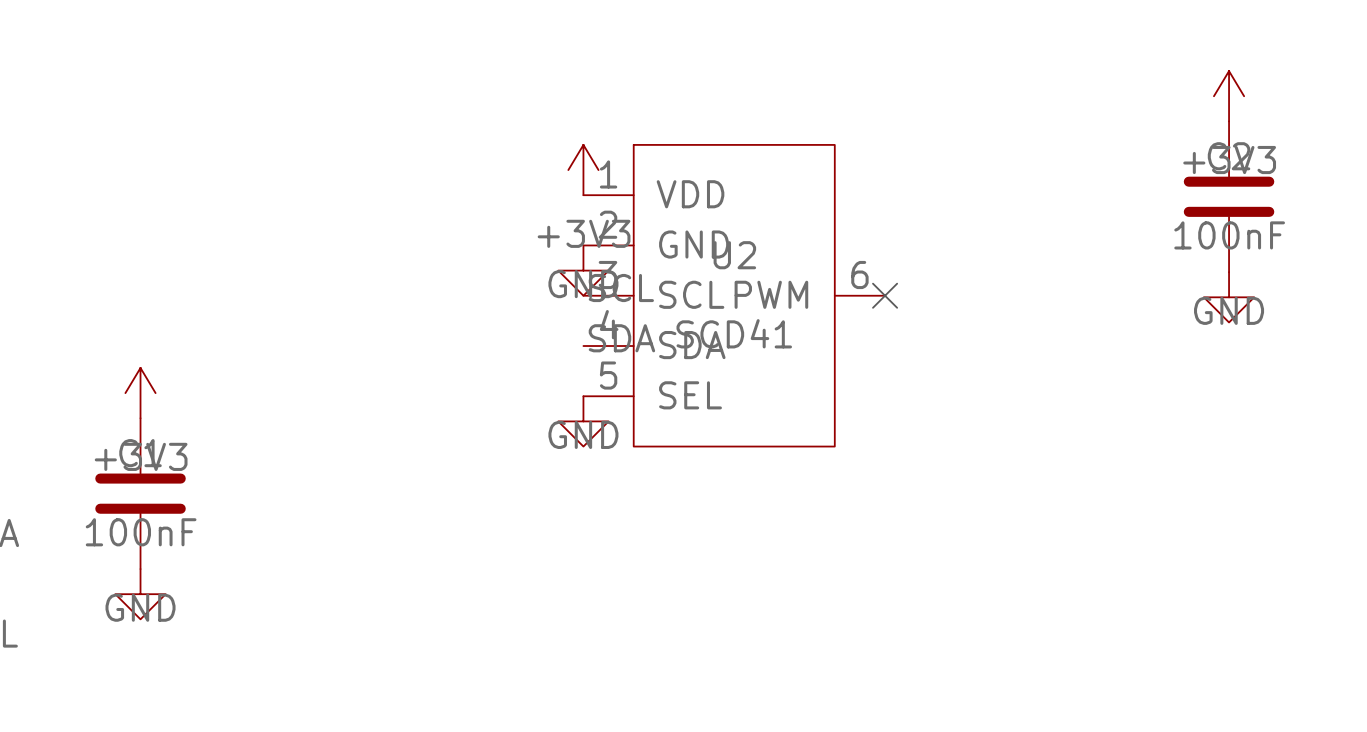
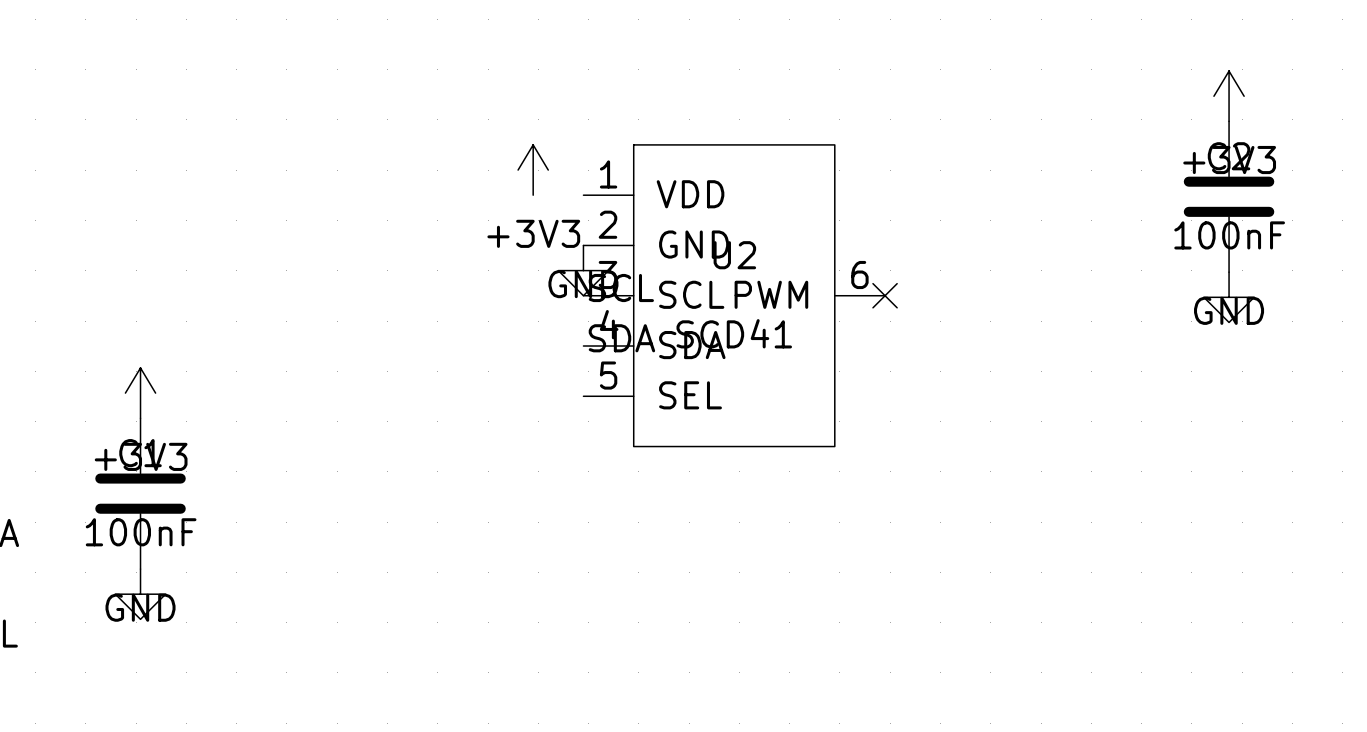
power symbol position: +3V3 (583, 170) -> +3V3 (533, 170)
power symbol: GND (583, 421) -> none

